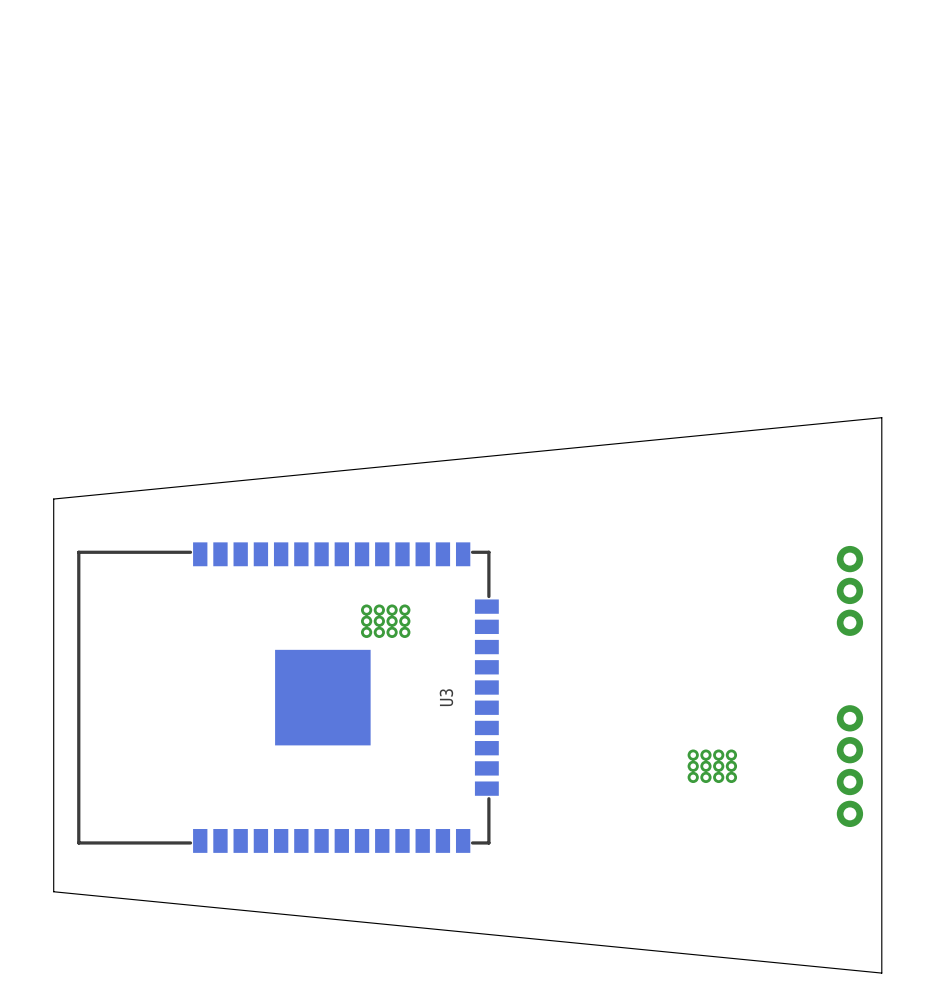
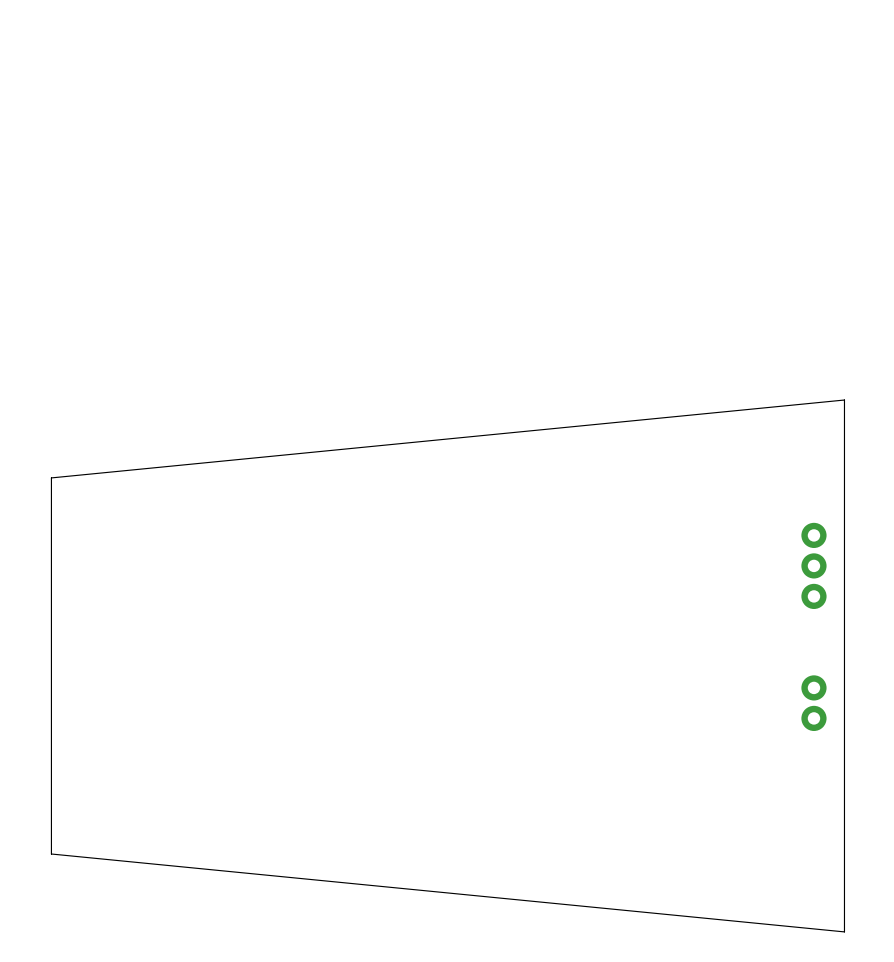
part: (385, 621) -> none
U3: (287, 697) -> none
part: (712, 766) -> none
part: (849, 782) -> none
part: (849, 813) -> none

